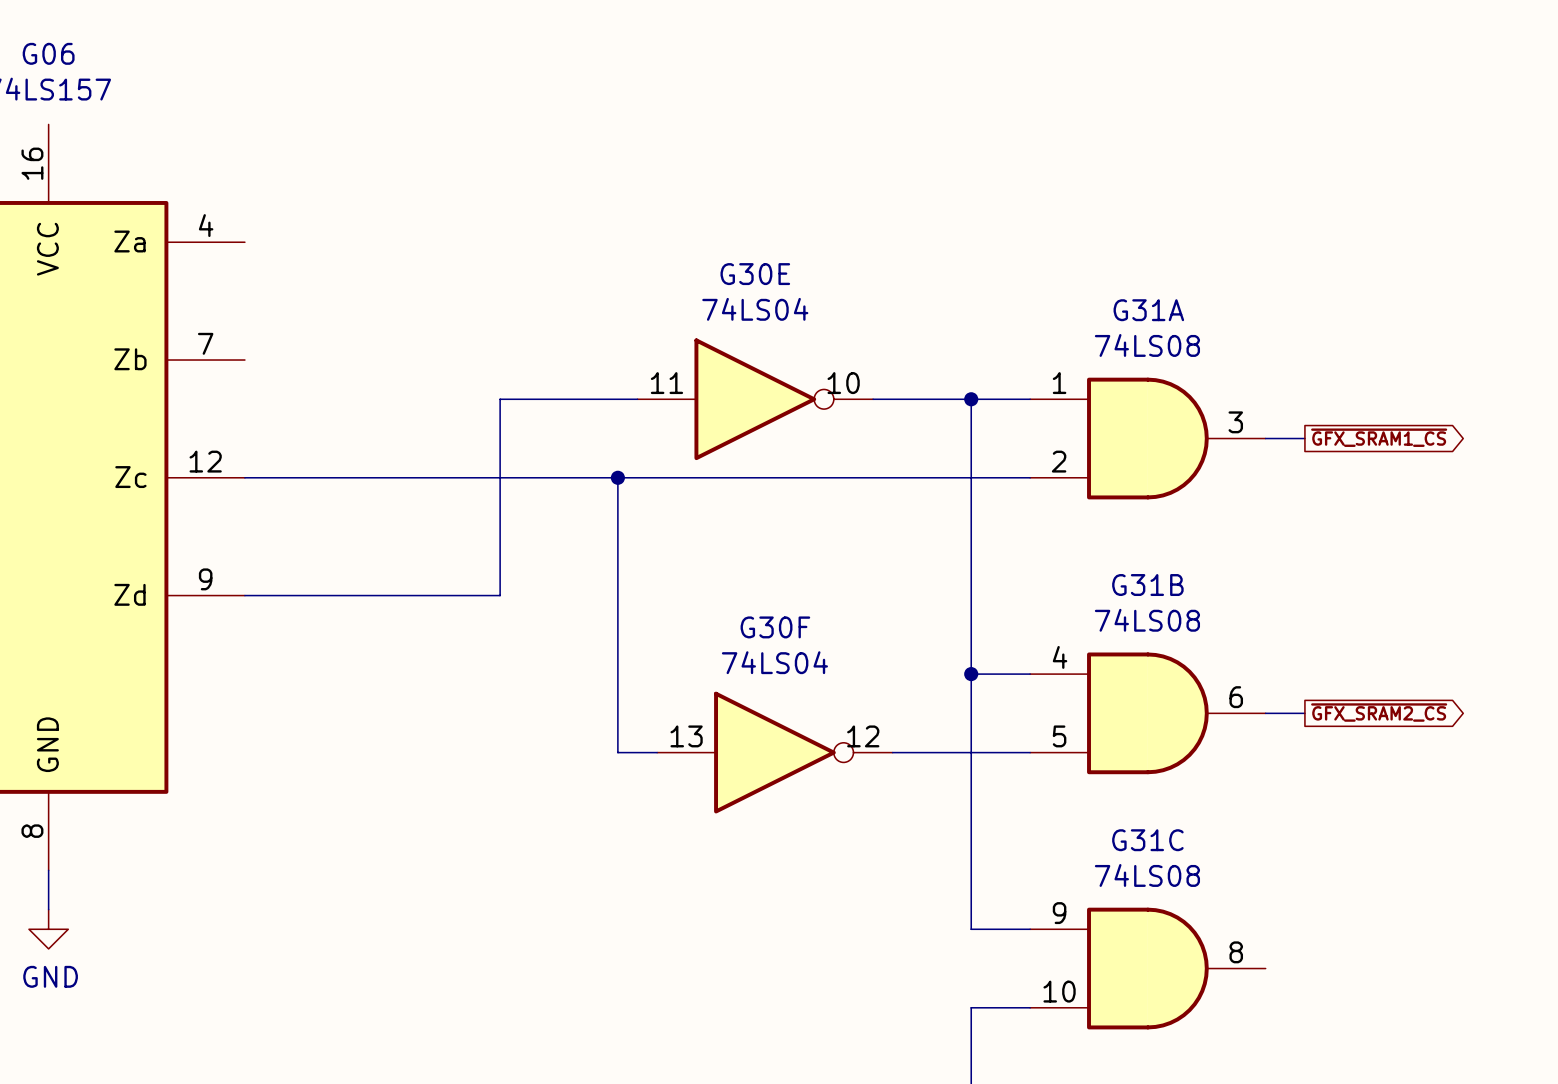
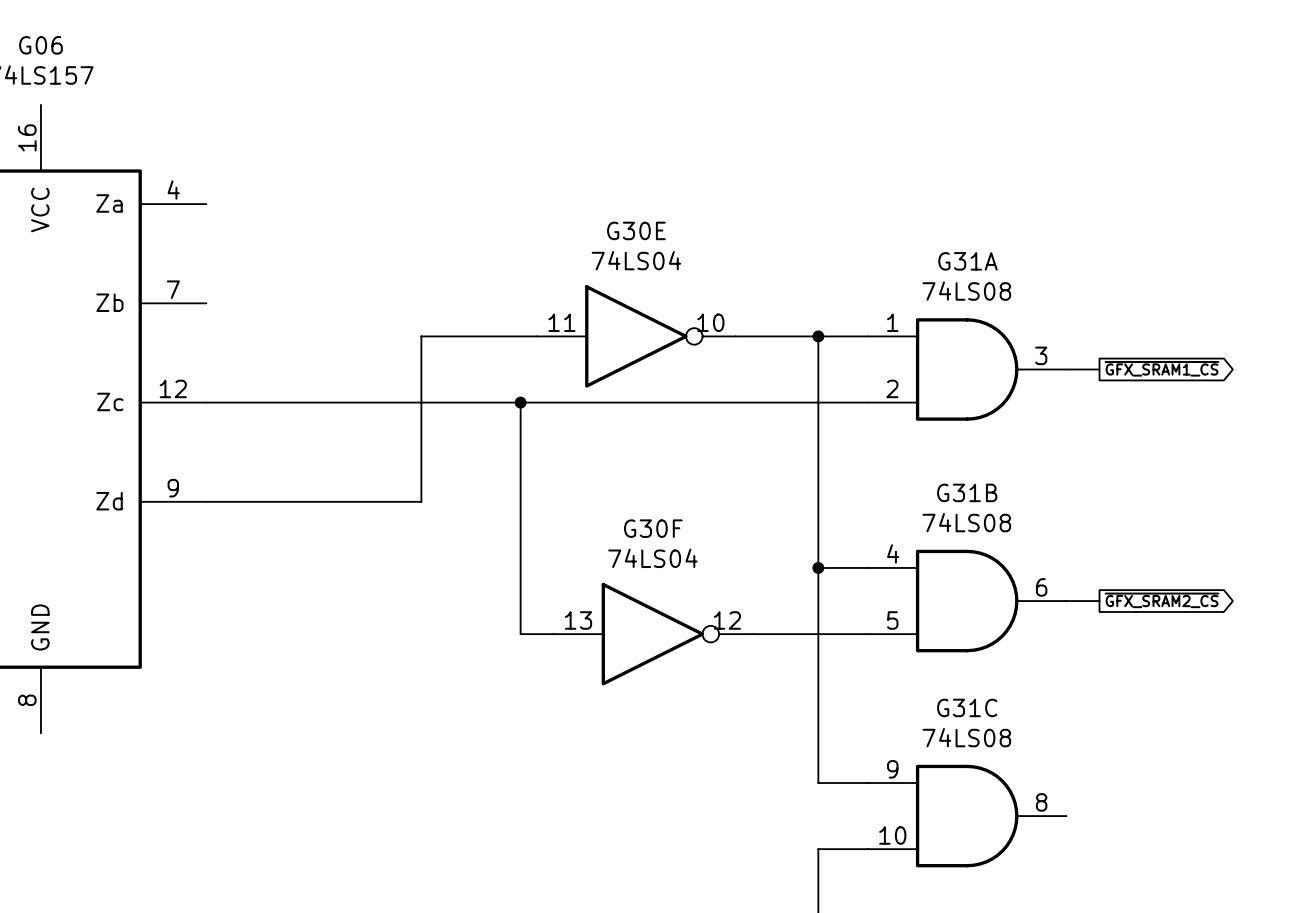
wire: (48, 870) (48, 909) -> none
power symbol: GND (48, 929) -> none

